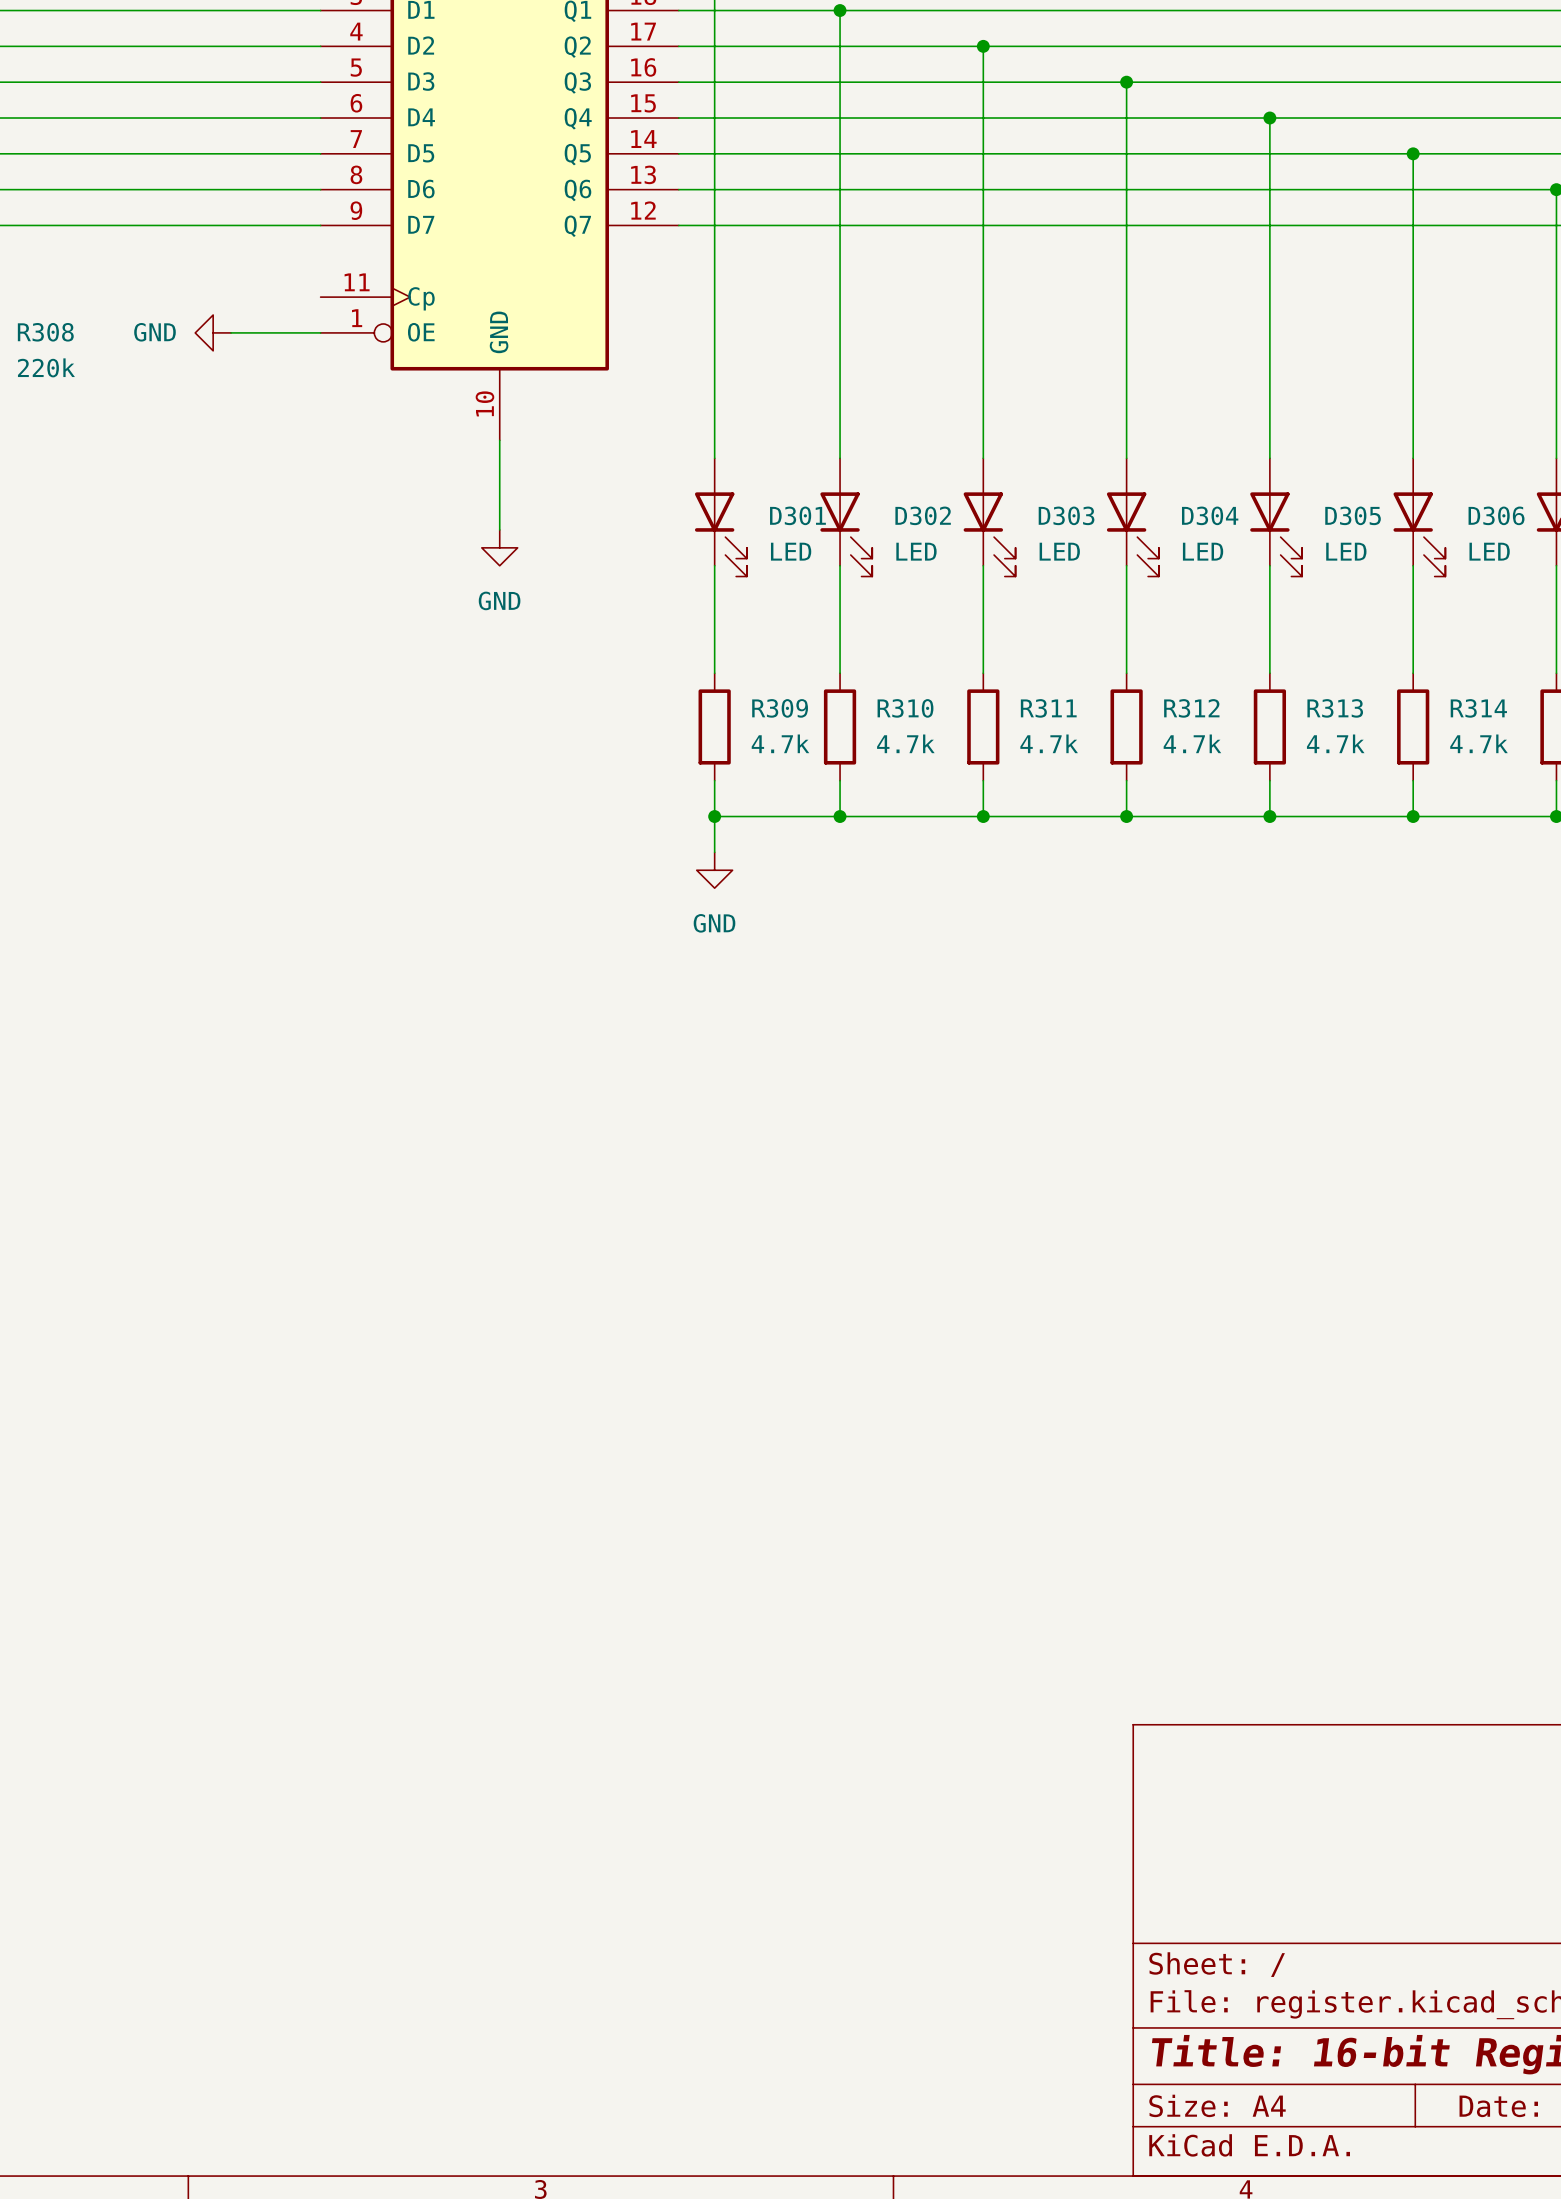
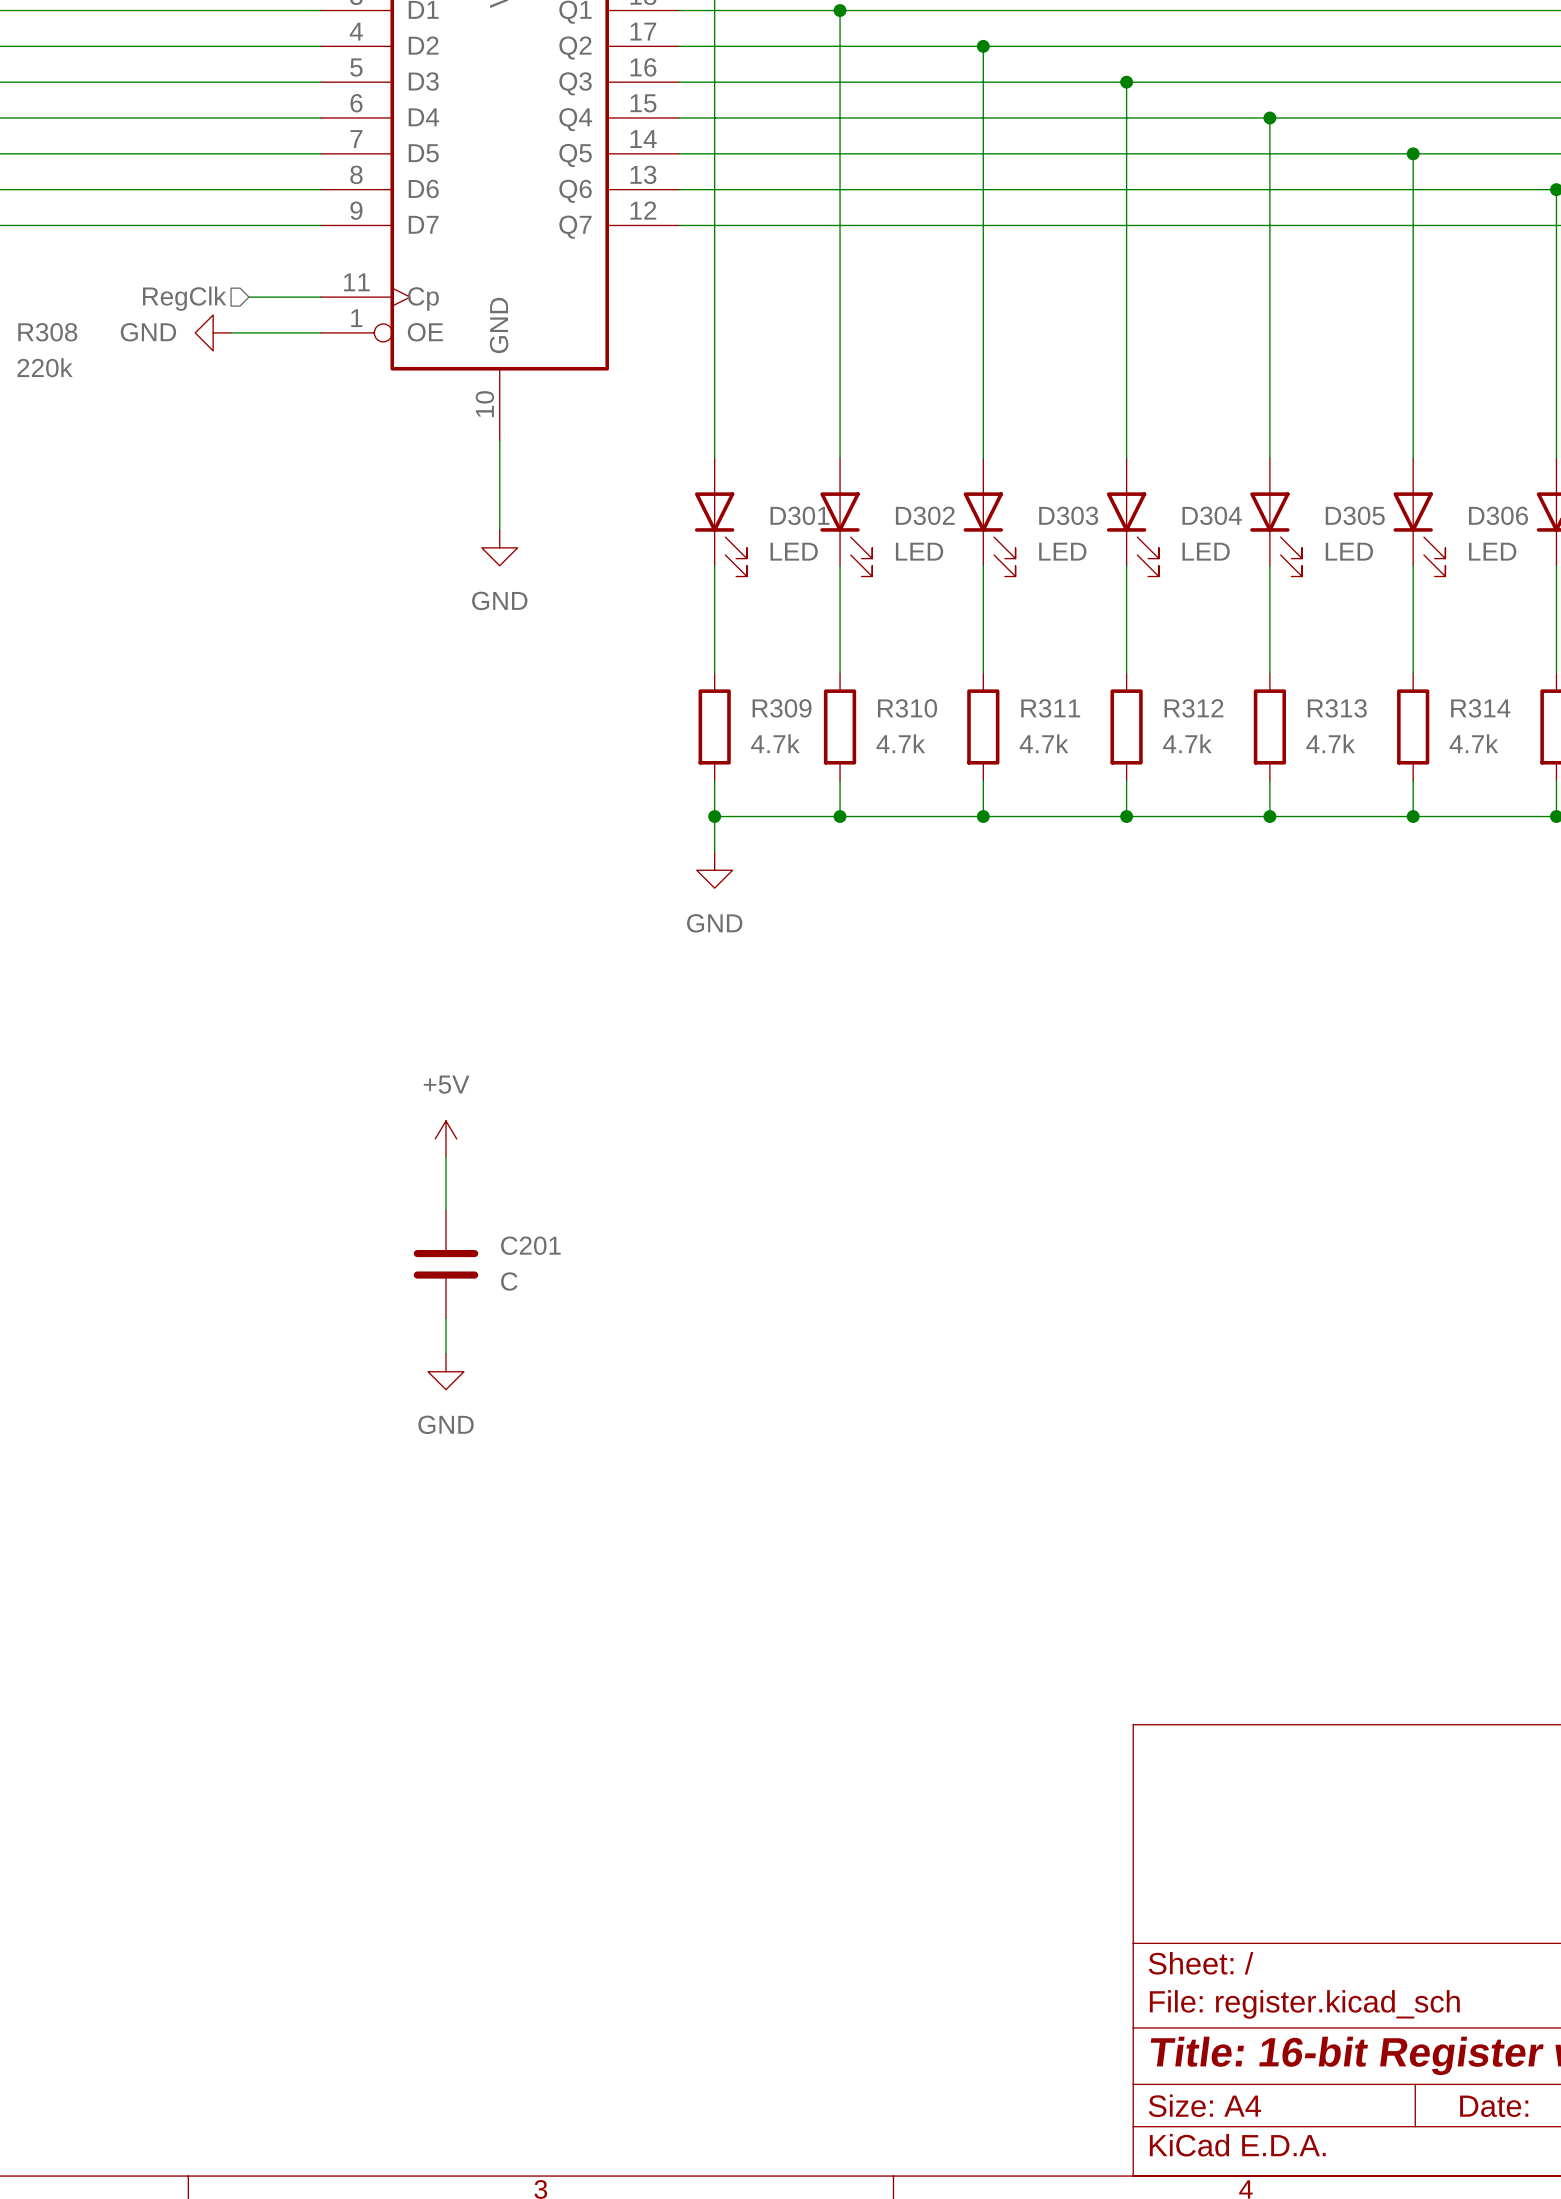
wire: none -> (248, 297) (320, 297)
hierarchical label: none -> RegClk (184, 298)
power symbol: none -> +5V (445, 1138)
wire: none -> (445, 1156) (445, 1210)
C201: none -> C (445, 1264)
wire: none -> (445, 1318) (445, 1353)
power symbol: none -> GND (445, 1371)

